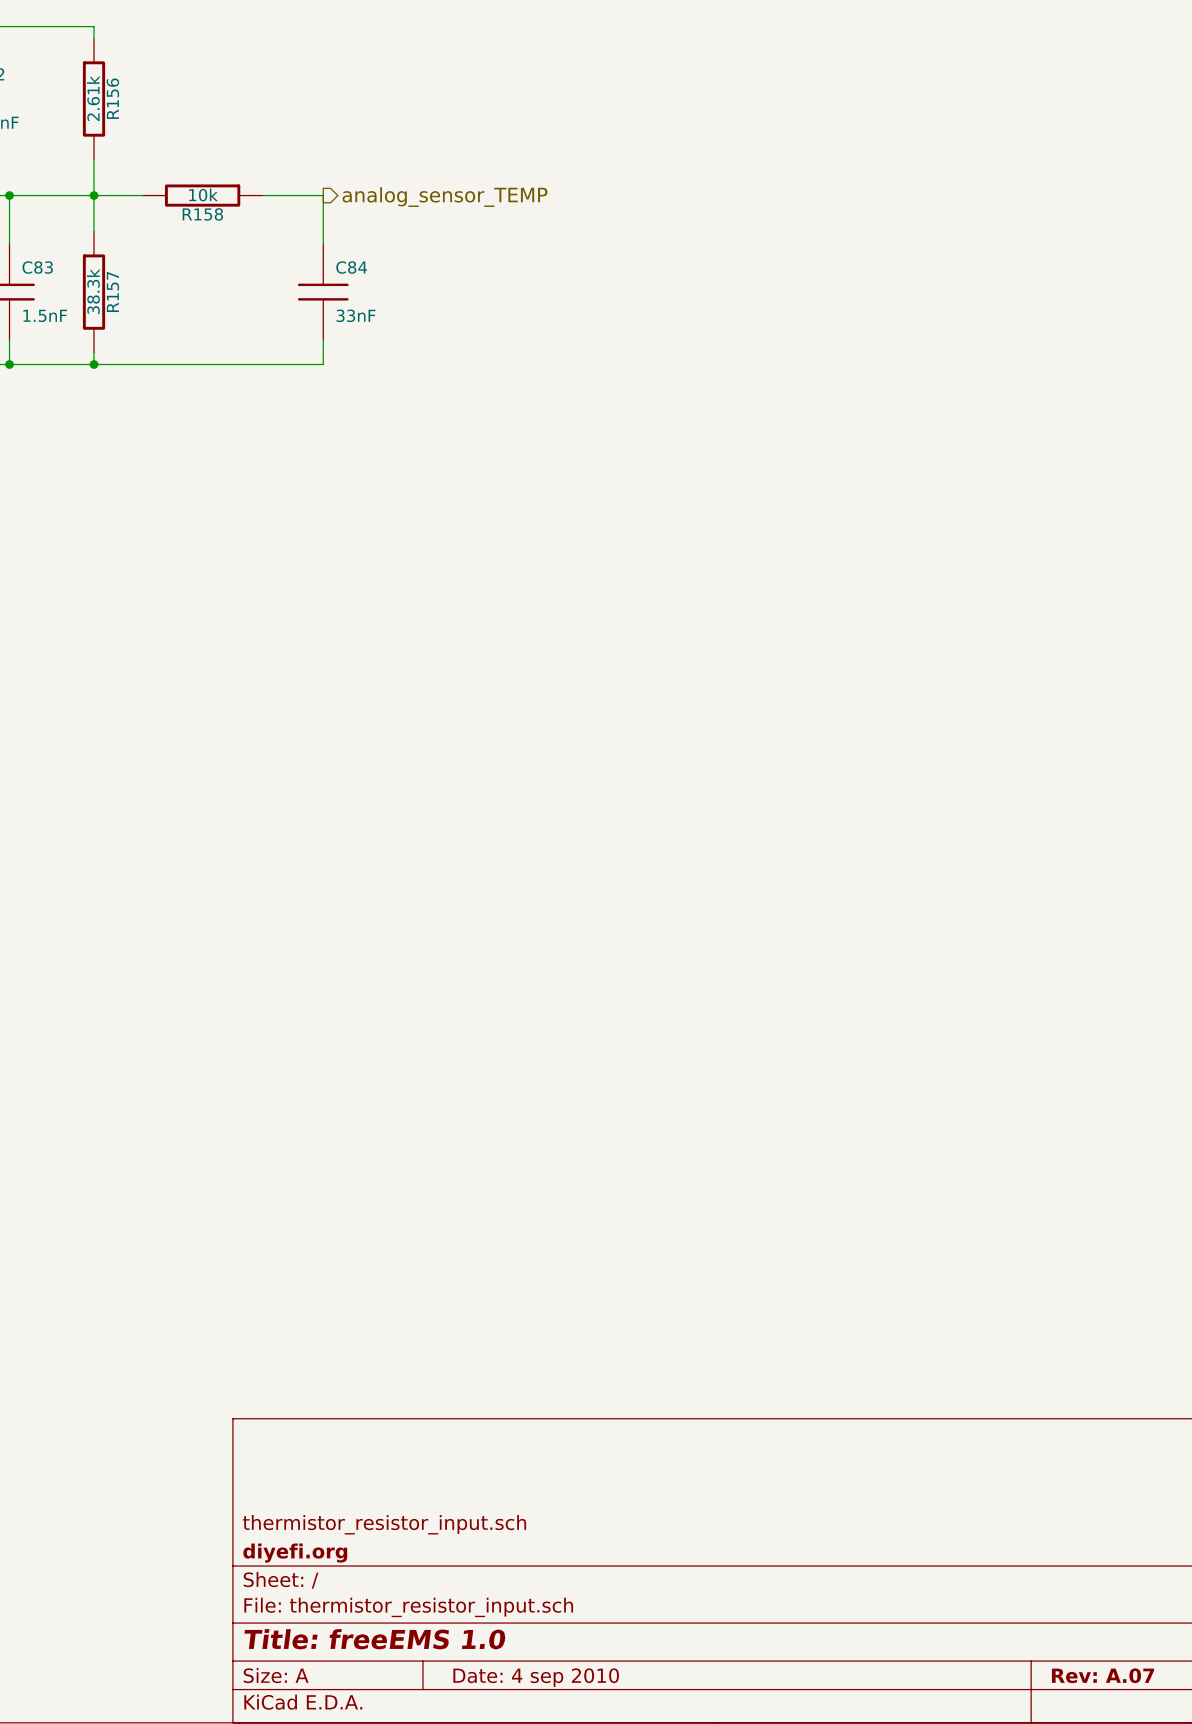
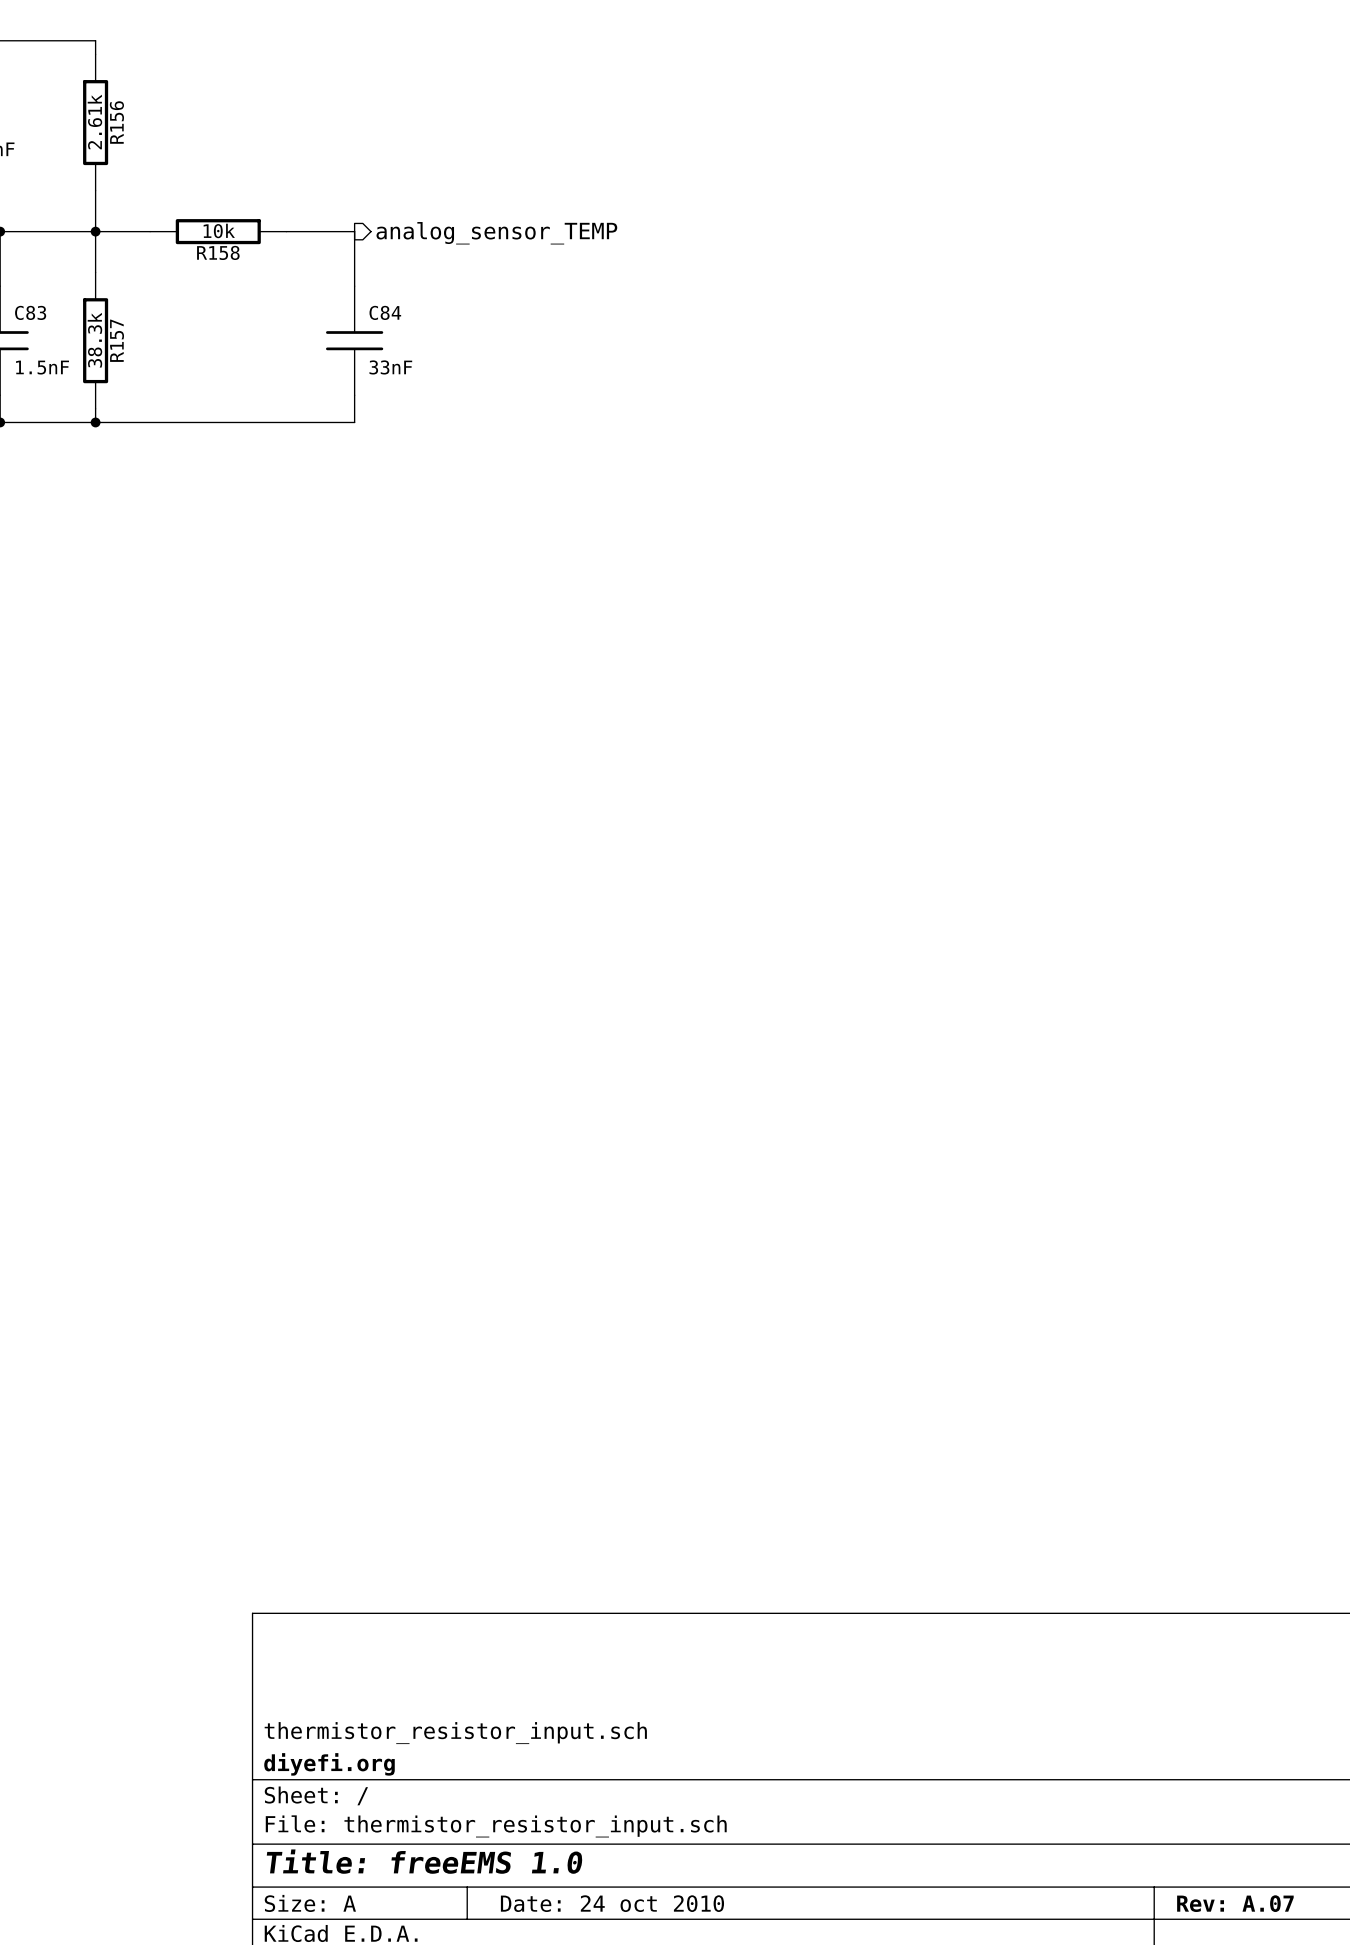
title block: Date: 4 sep 2010 (536, 1677) -> Date: 24 oct 2010 (612, 1903)

